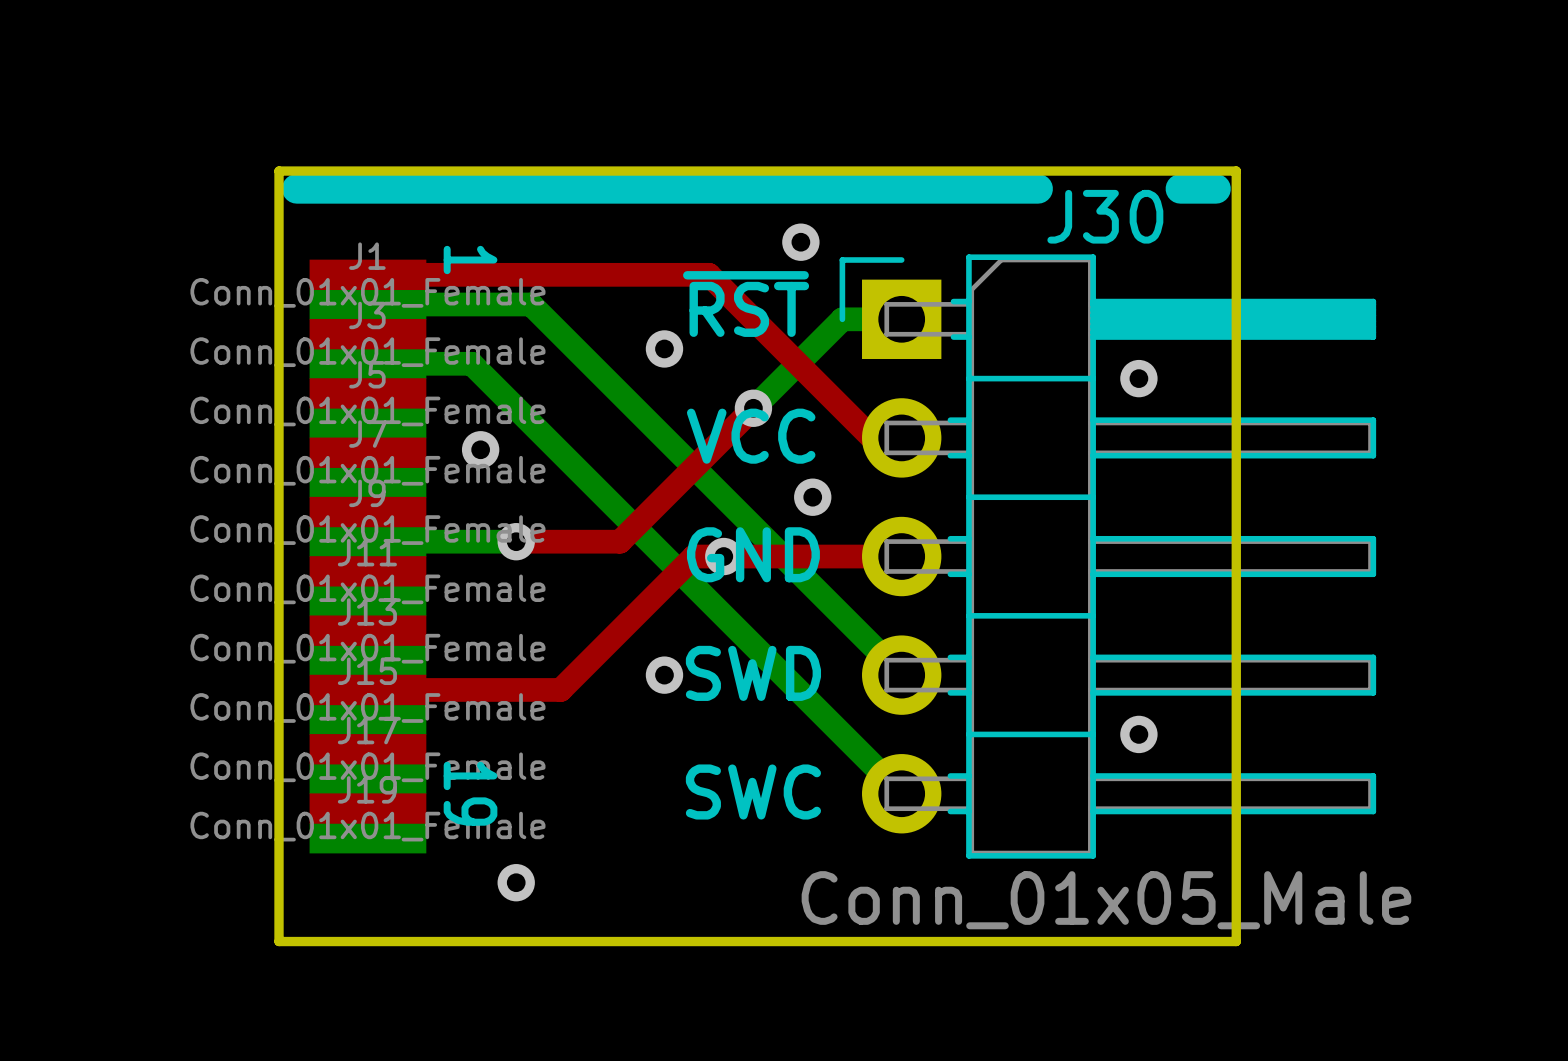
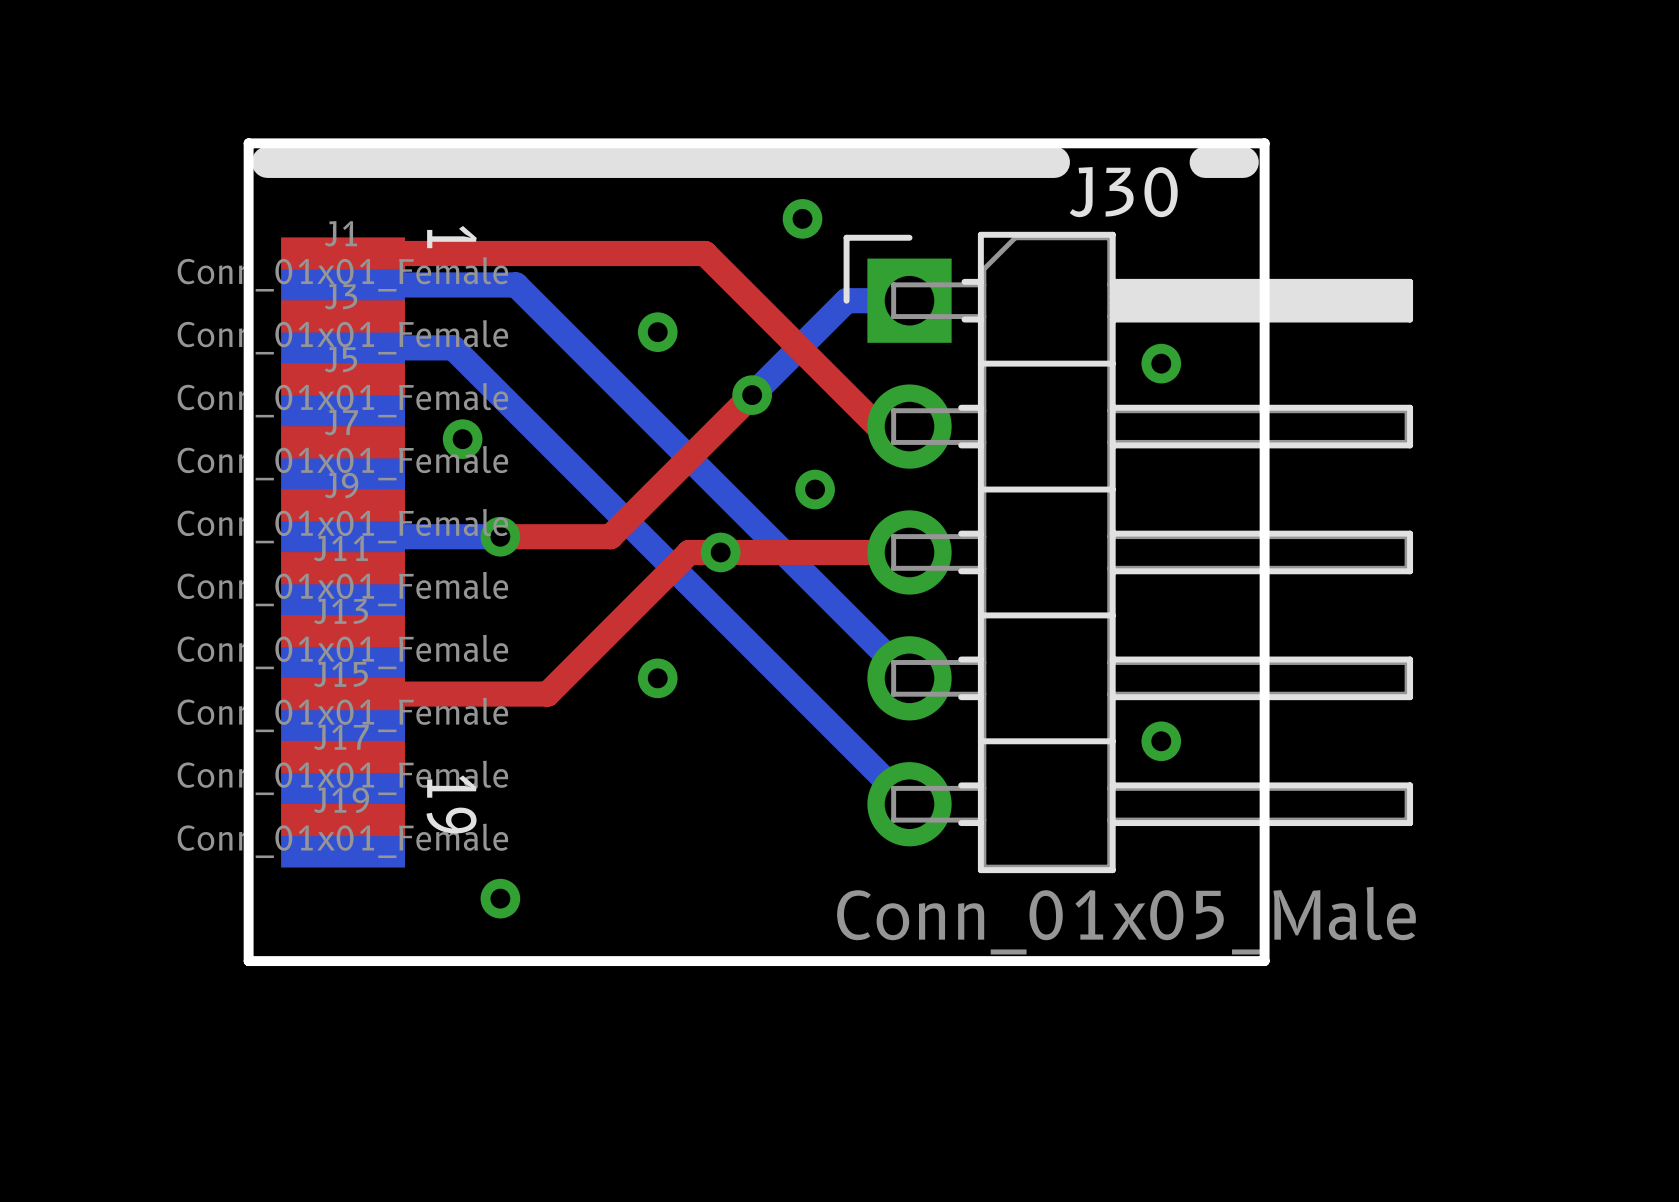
text: ~{RST} (746, 304) -> none
text: VCC (751, 436) -> none
text: GND (753, 554) -> none
text: SWD (753, 673) -> none
text: SWC (753, 791) -> none

